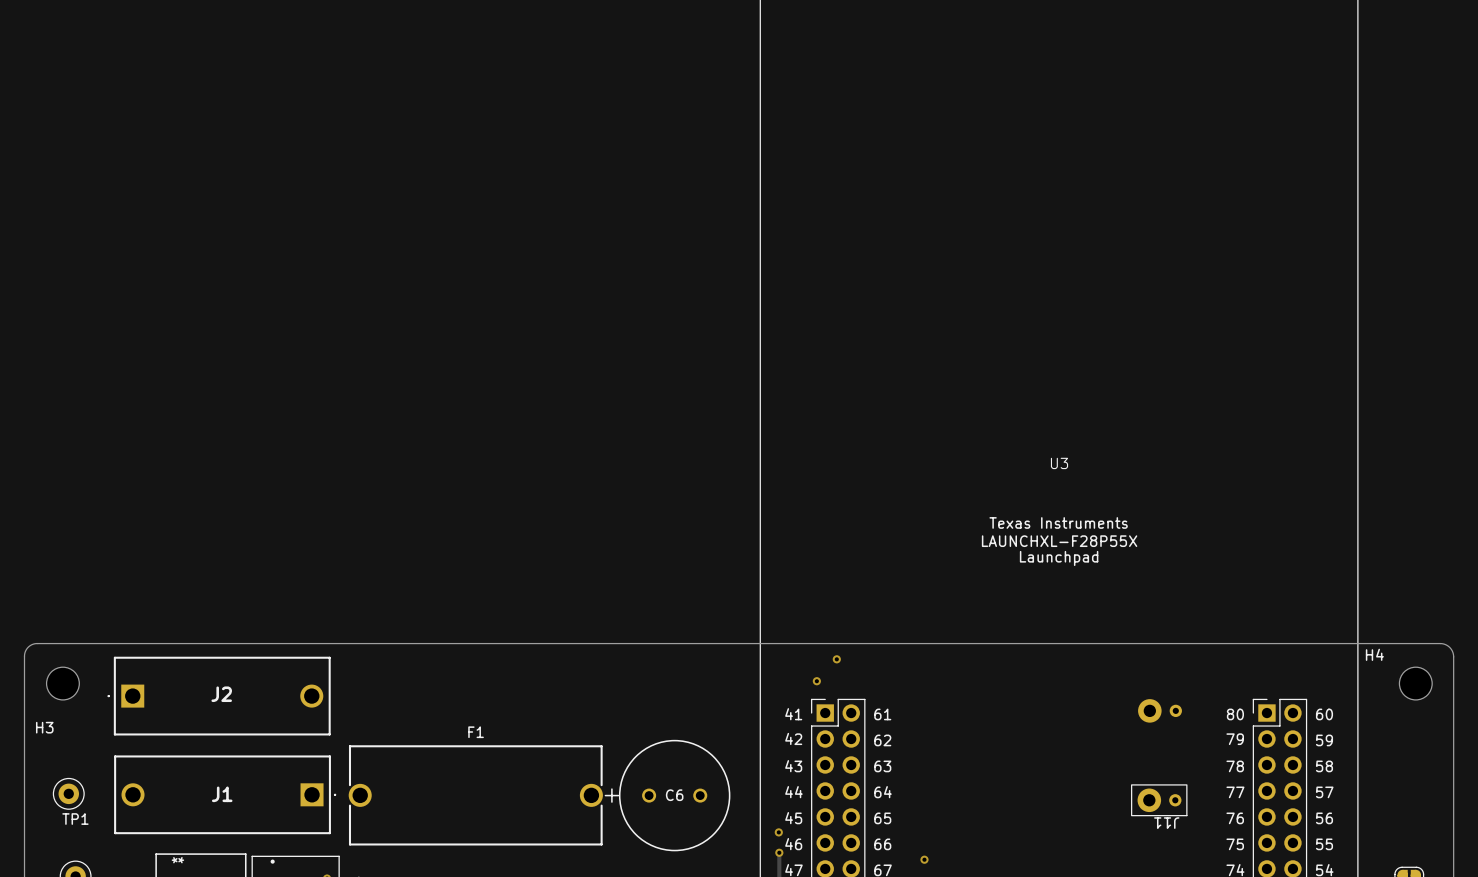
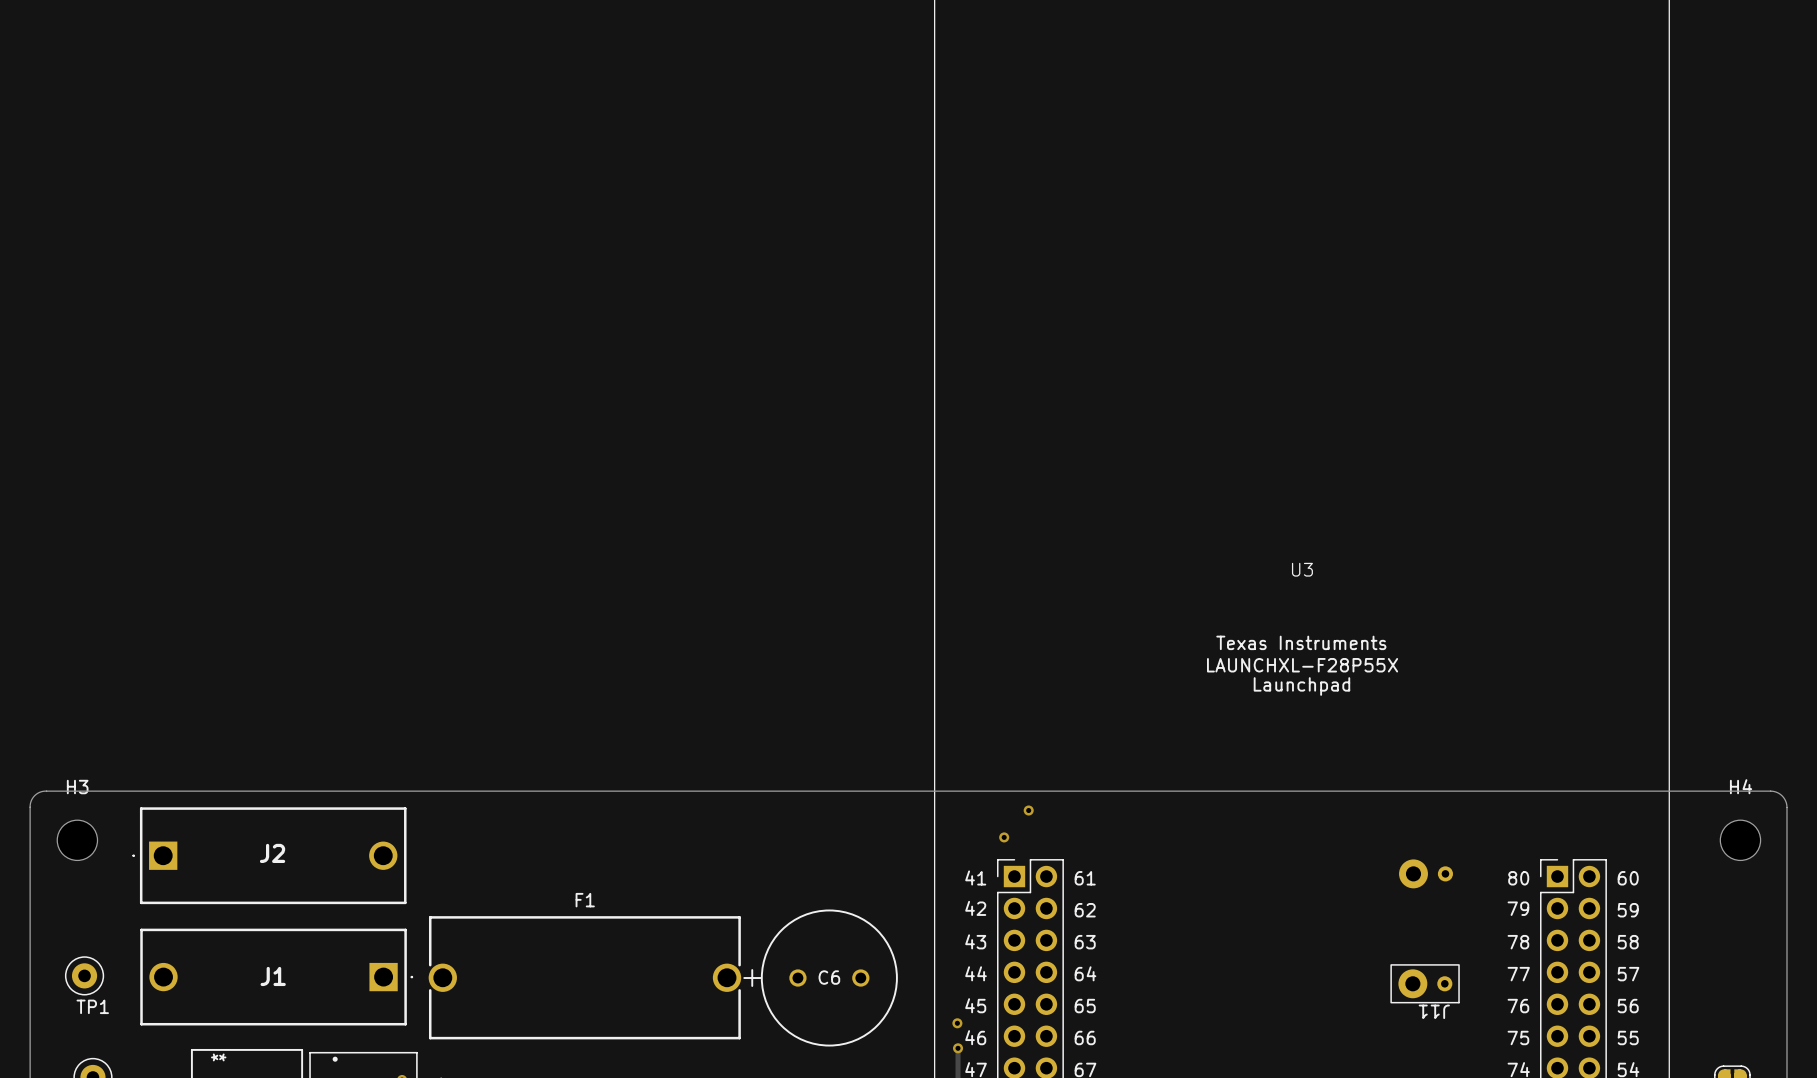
H4 name position: H4 (1374, 654) -> H4 (1741, 786)
H3 name position: H3 (44, 727) -> H3 (77, 787)
via: (924, 859) -> none

